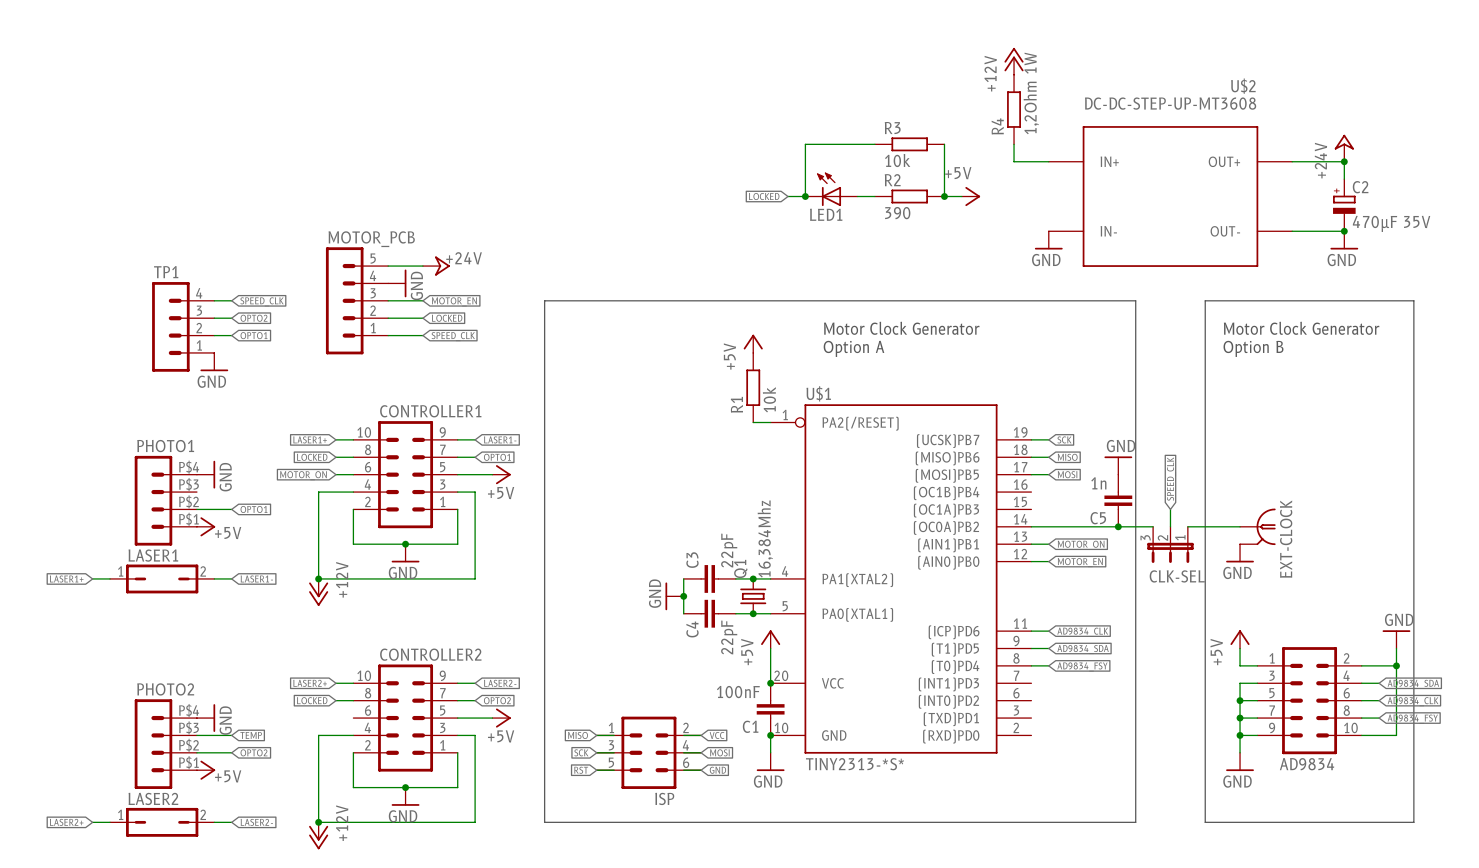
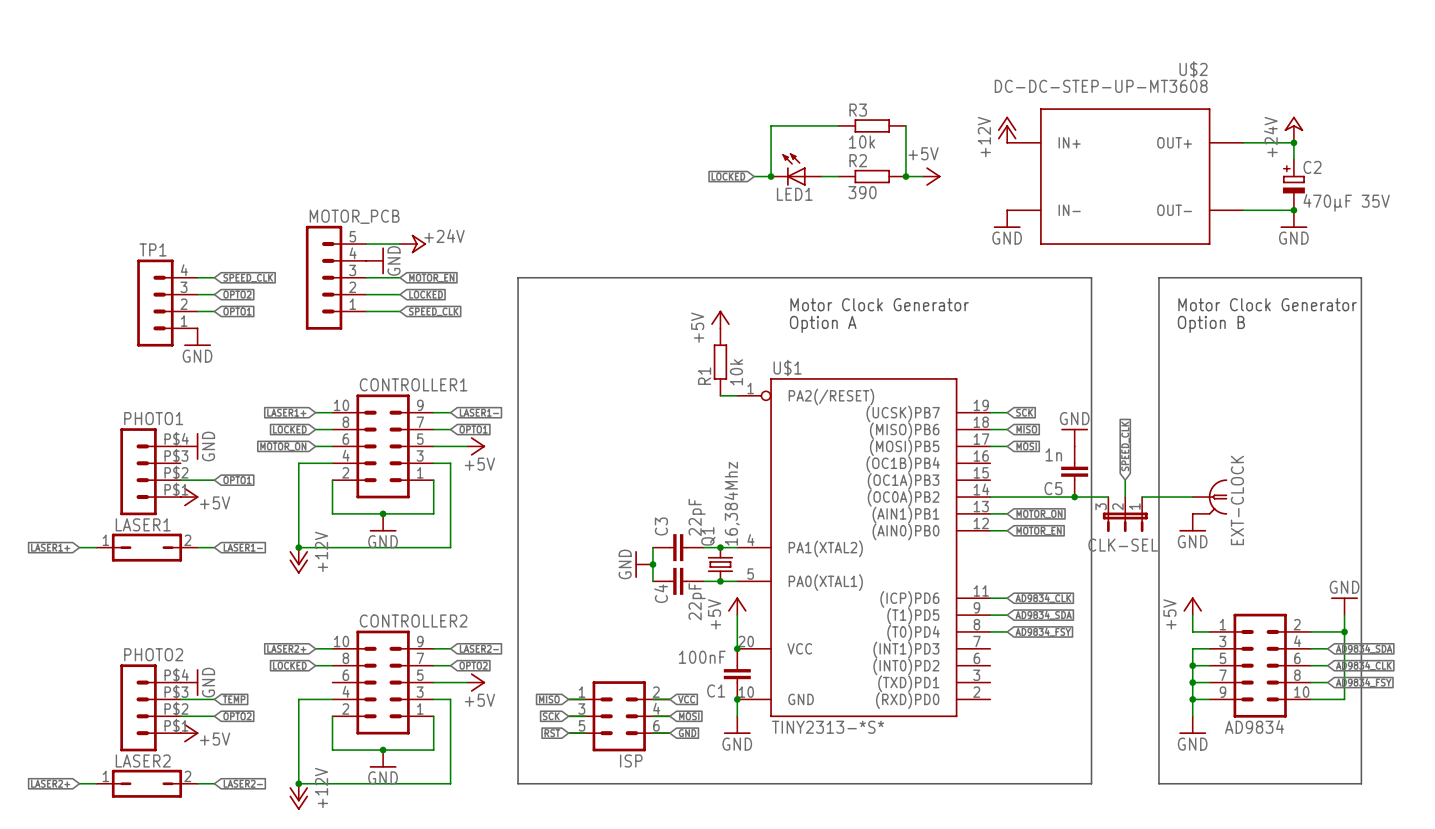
power symbol position: +12V (1014, 61) -> +12V (1007, 129)
R4: 1,2Ohm 1W (1014, 109) -> none
wire: (1014, 144) (1014, 161) (1048, 161) -> none

